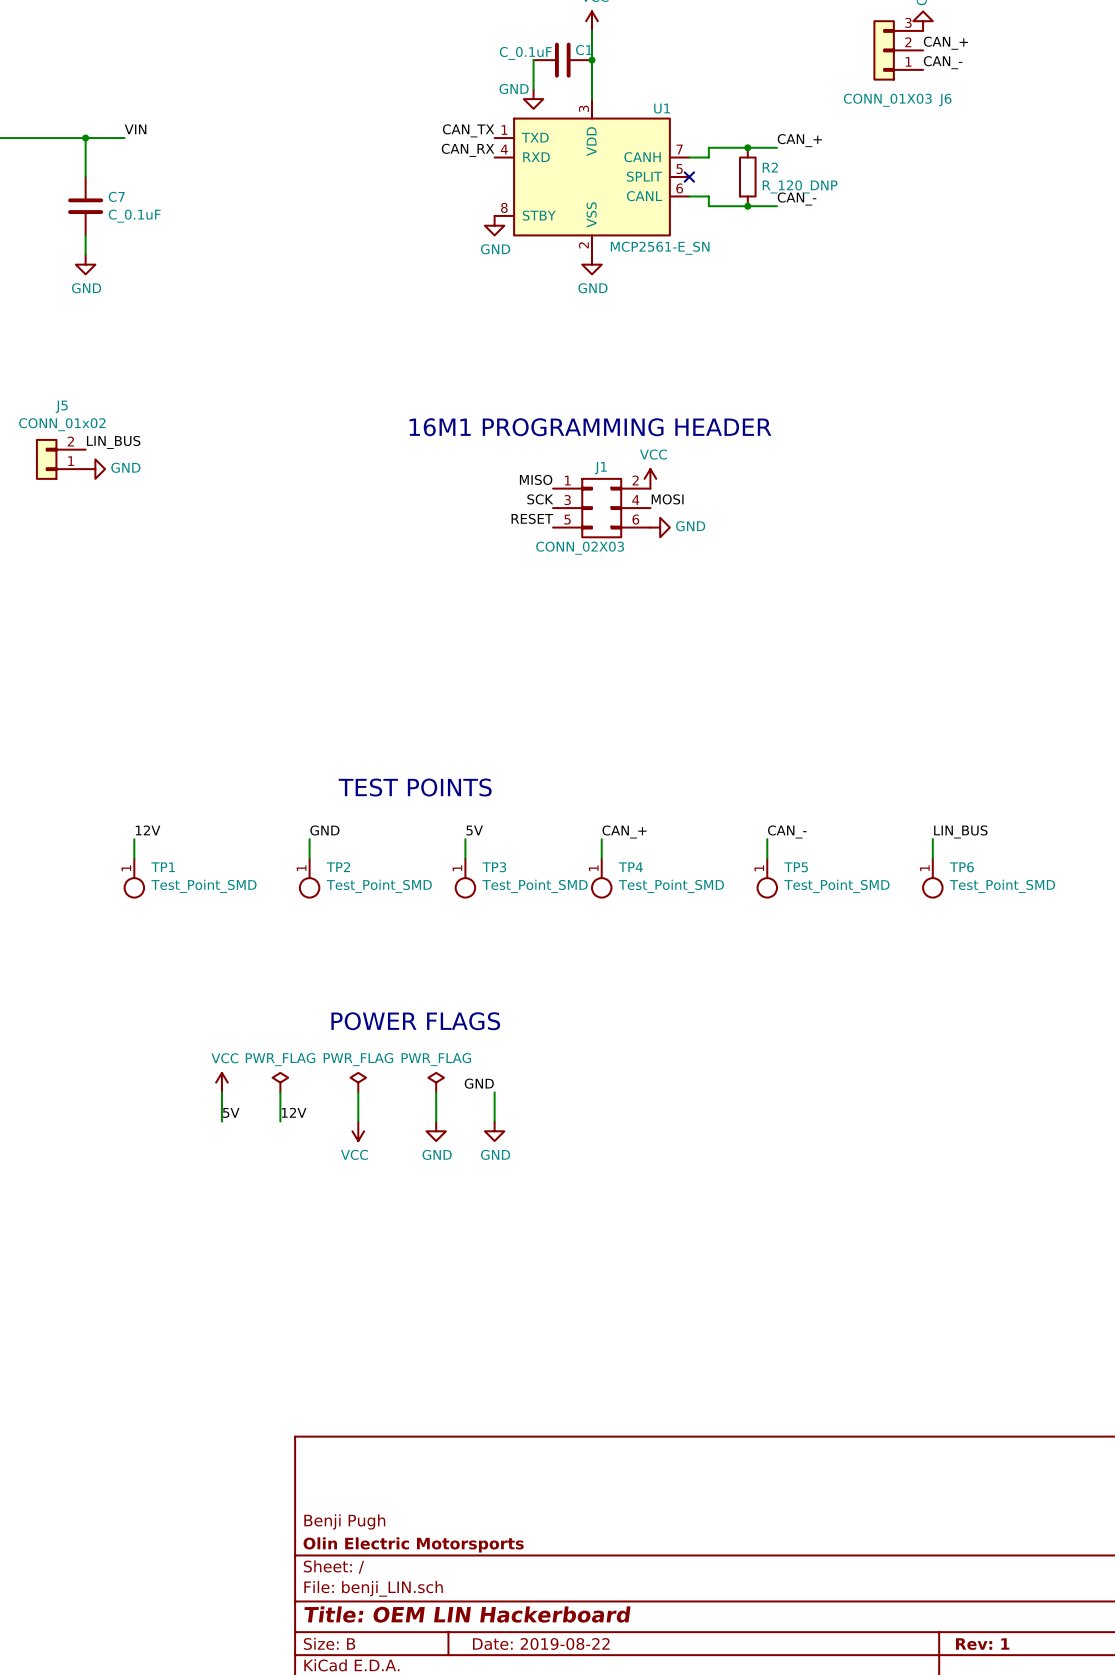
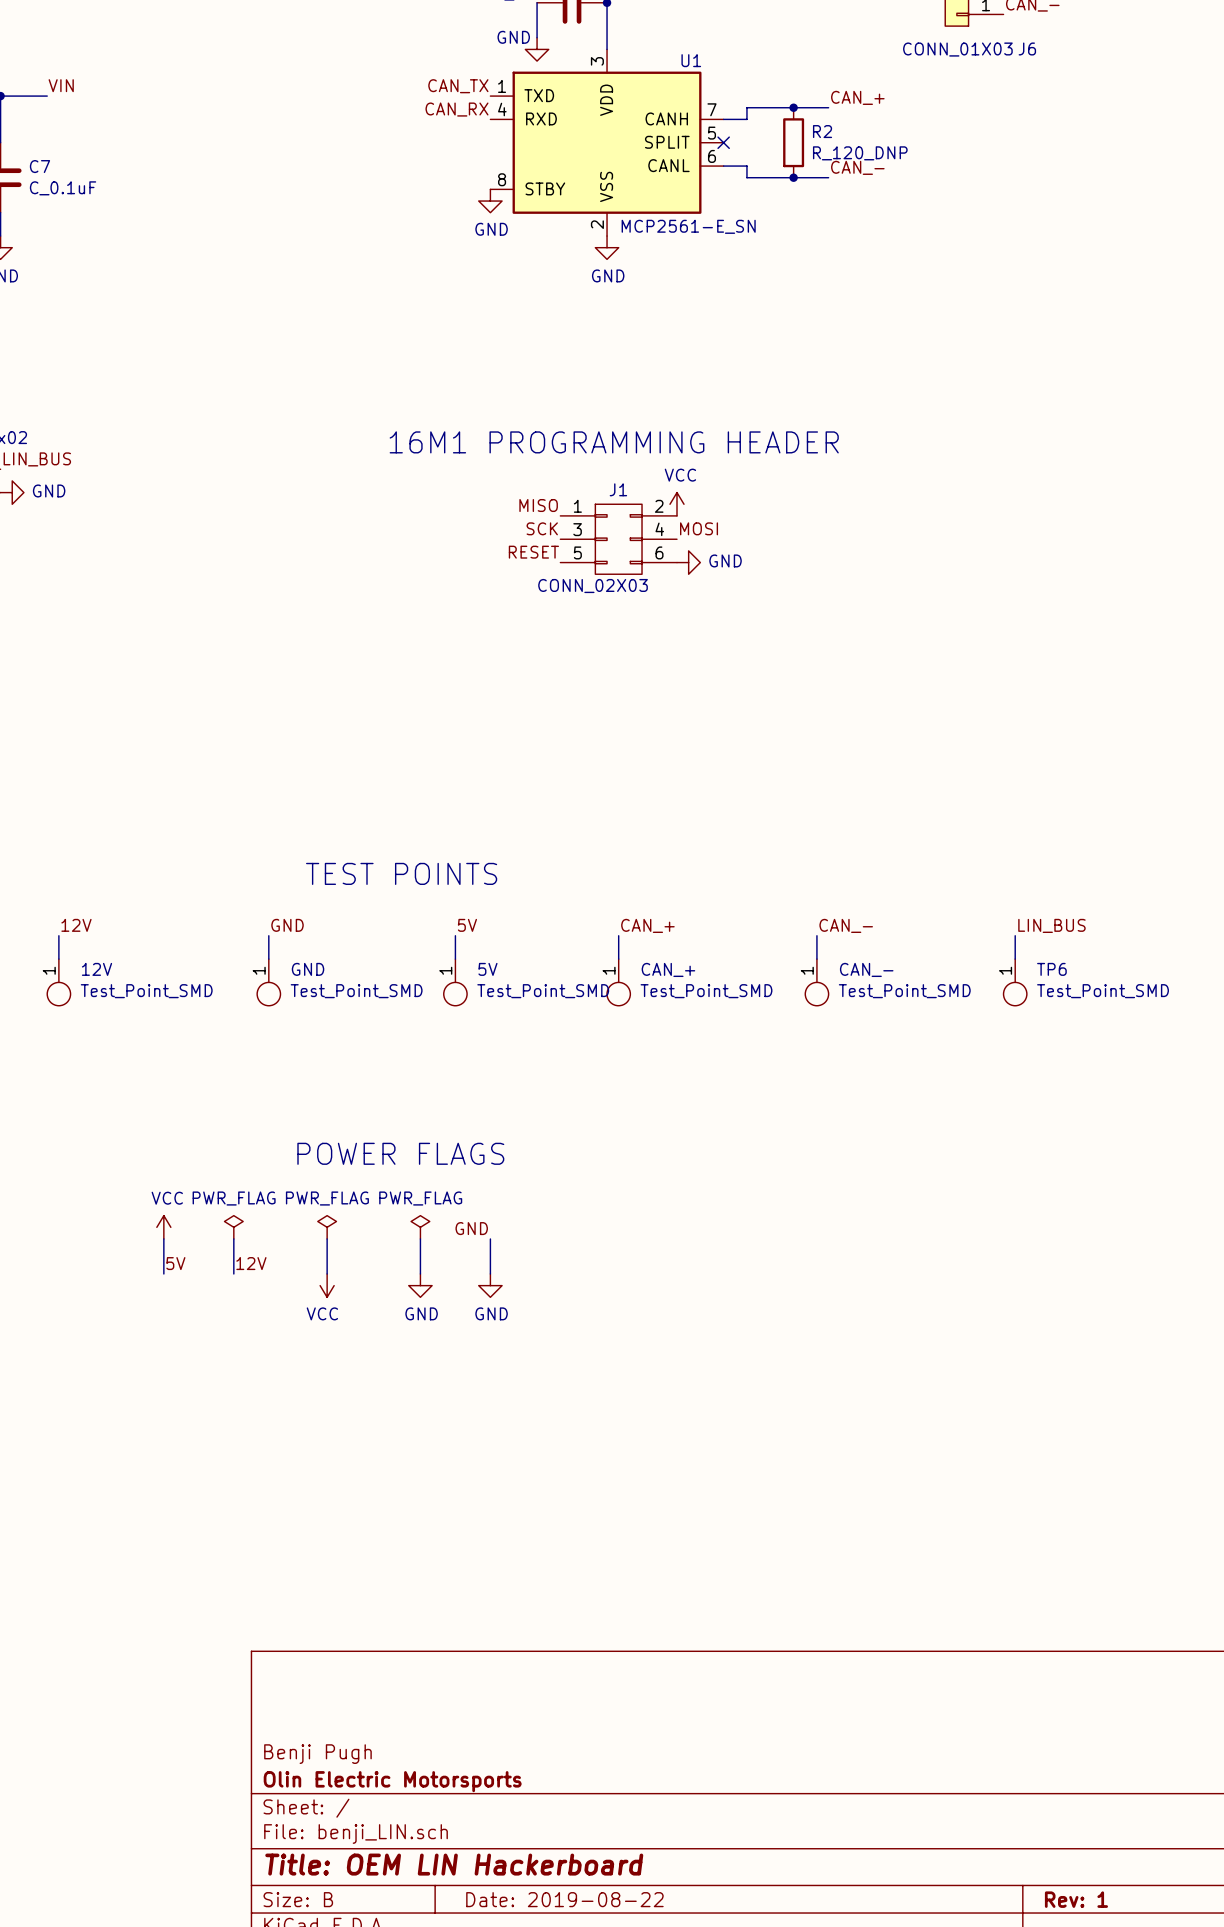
TP1 name: TP1 (163, 867) -> 12V (97, 969)
TP2 name: TP2 (338, 867) -> GND (308, 969)
TP3 name: TP3 (494, 867) -> 5V (487, 969)
TP4 name: TP4 (630, 867) -> CAN_+ (668, 969)
TP5 name: TP5 (796, 867) -> CAN_- (866, 969)

